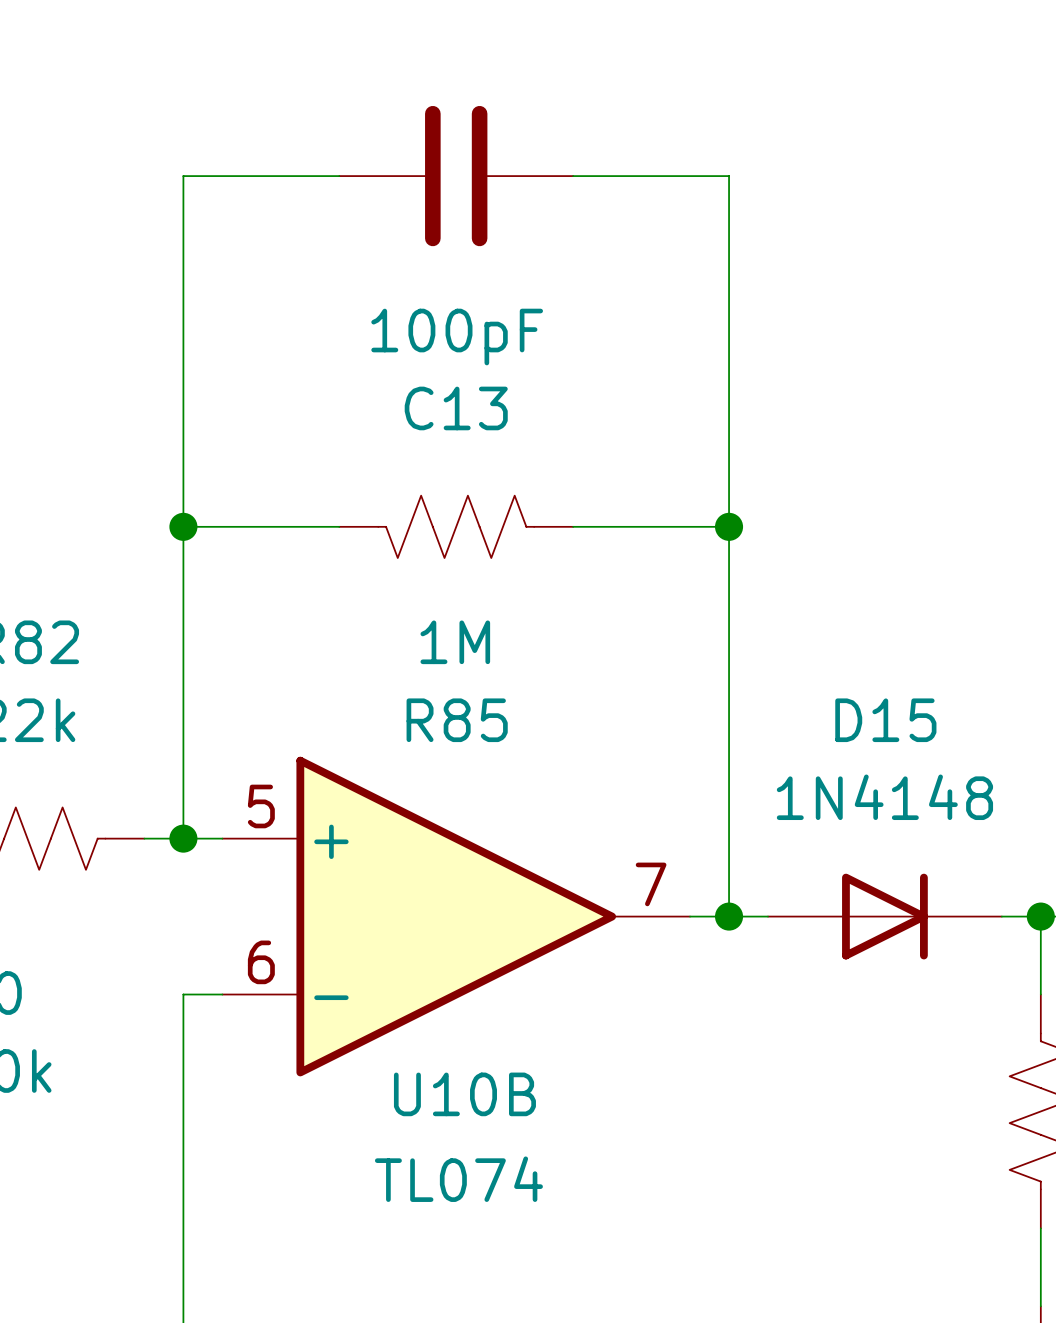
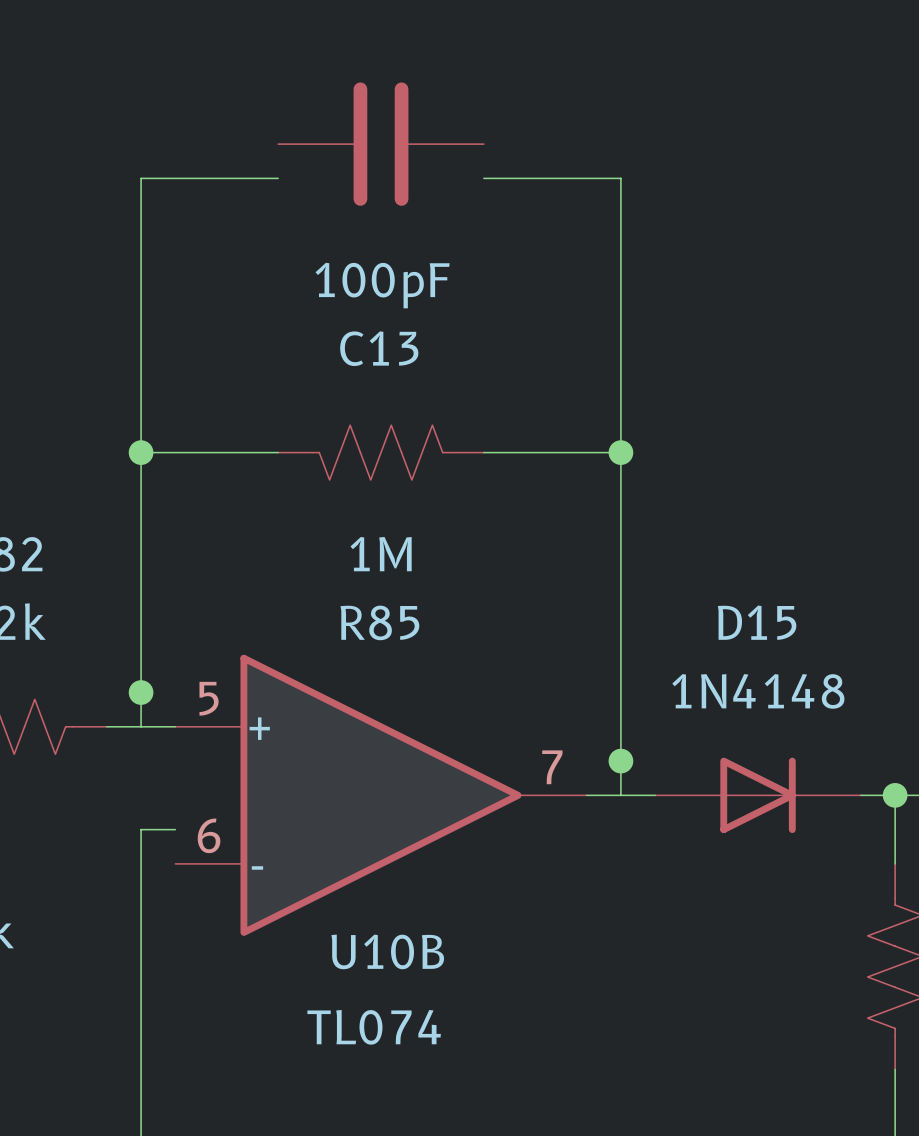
wire: (339, 176) (183, 176) (183, 215) -> (278, 178) (141, 178)
wire: (573, 176) (729, 176) (729, 215) -> (483, 178) (620, 178)
junction position: (183, 838) -> (141, 692)
junction position: (729, 916) -> (620, 761)
wire: (183, 994) (222, 994) -> (141, 863) (141, 829) (175, 829)

